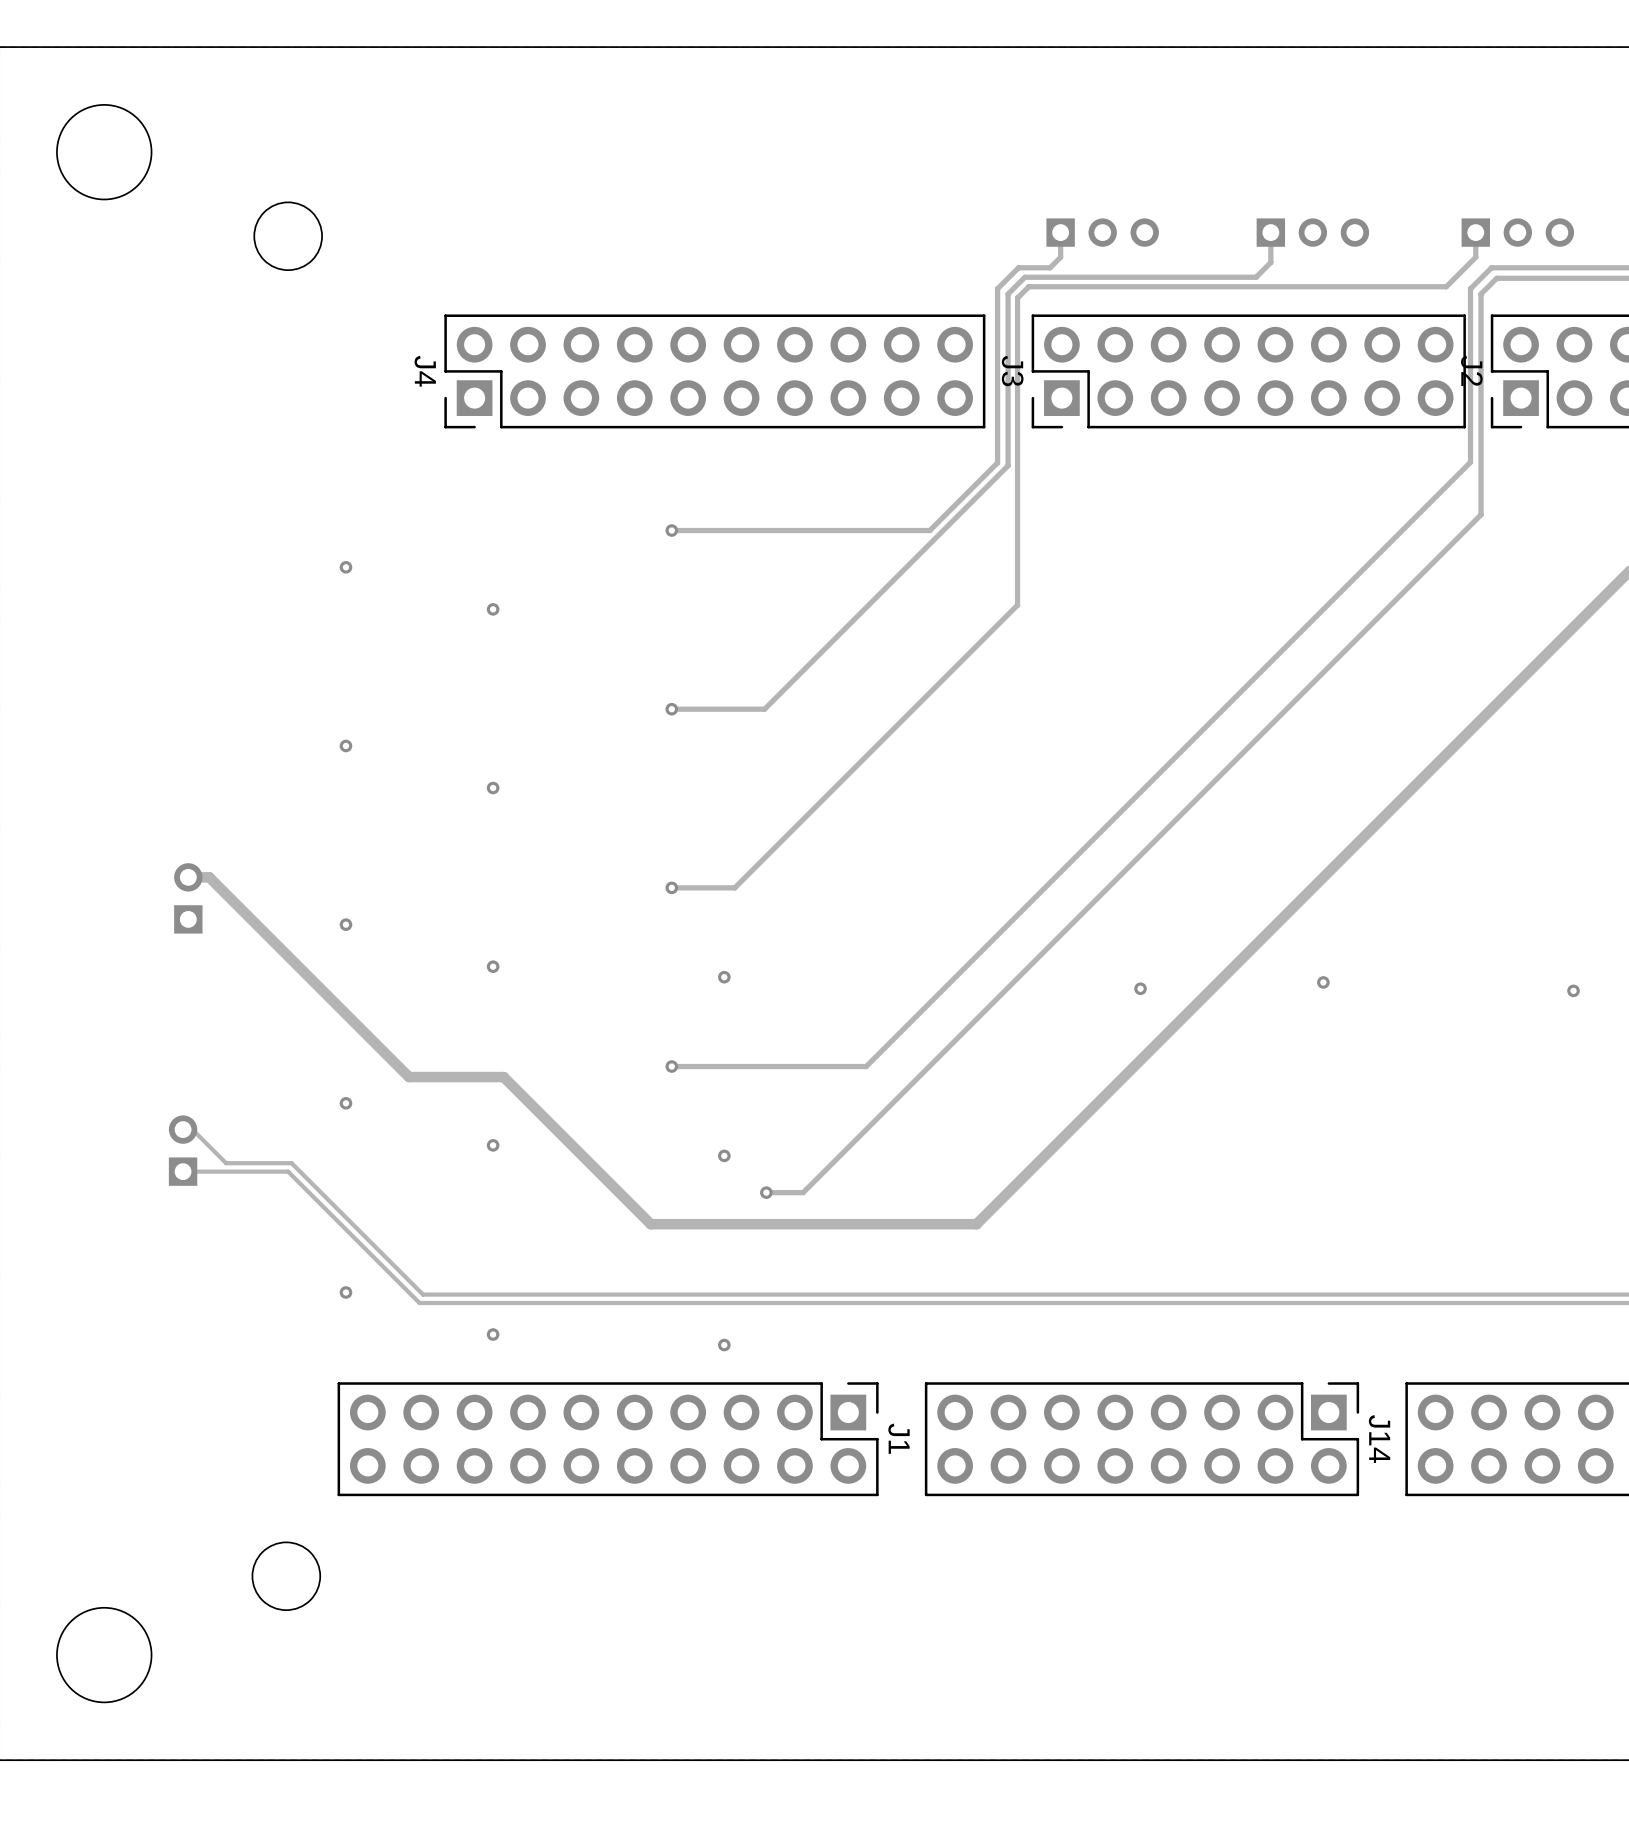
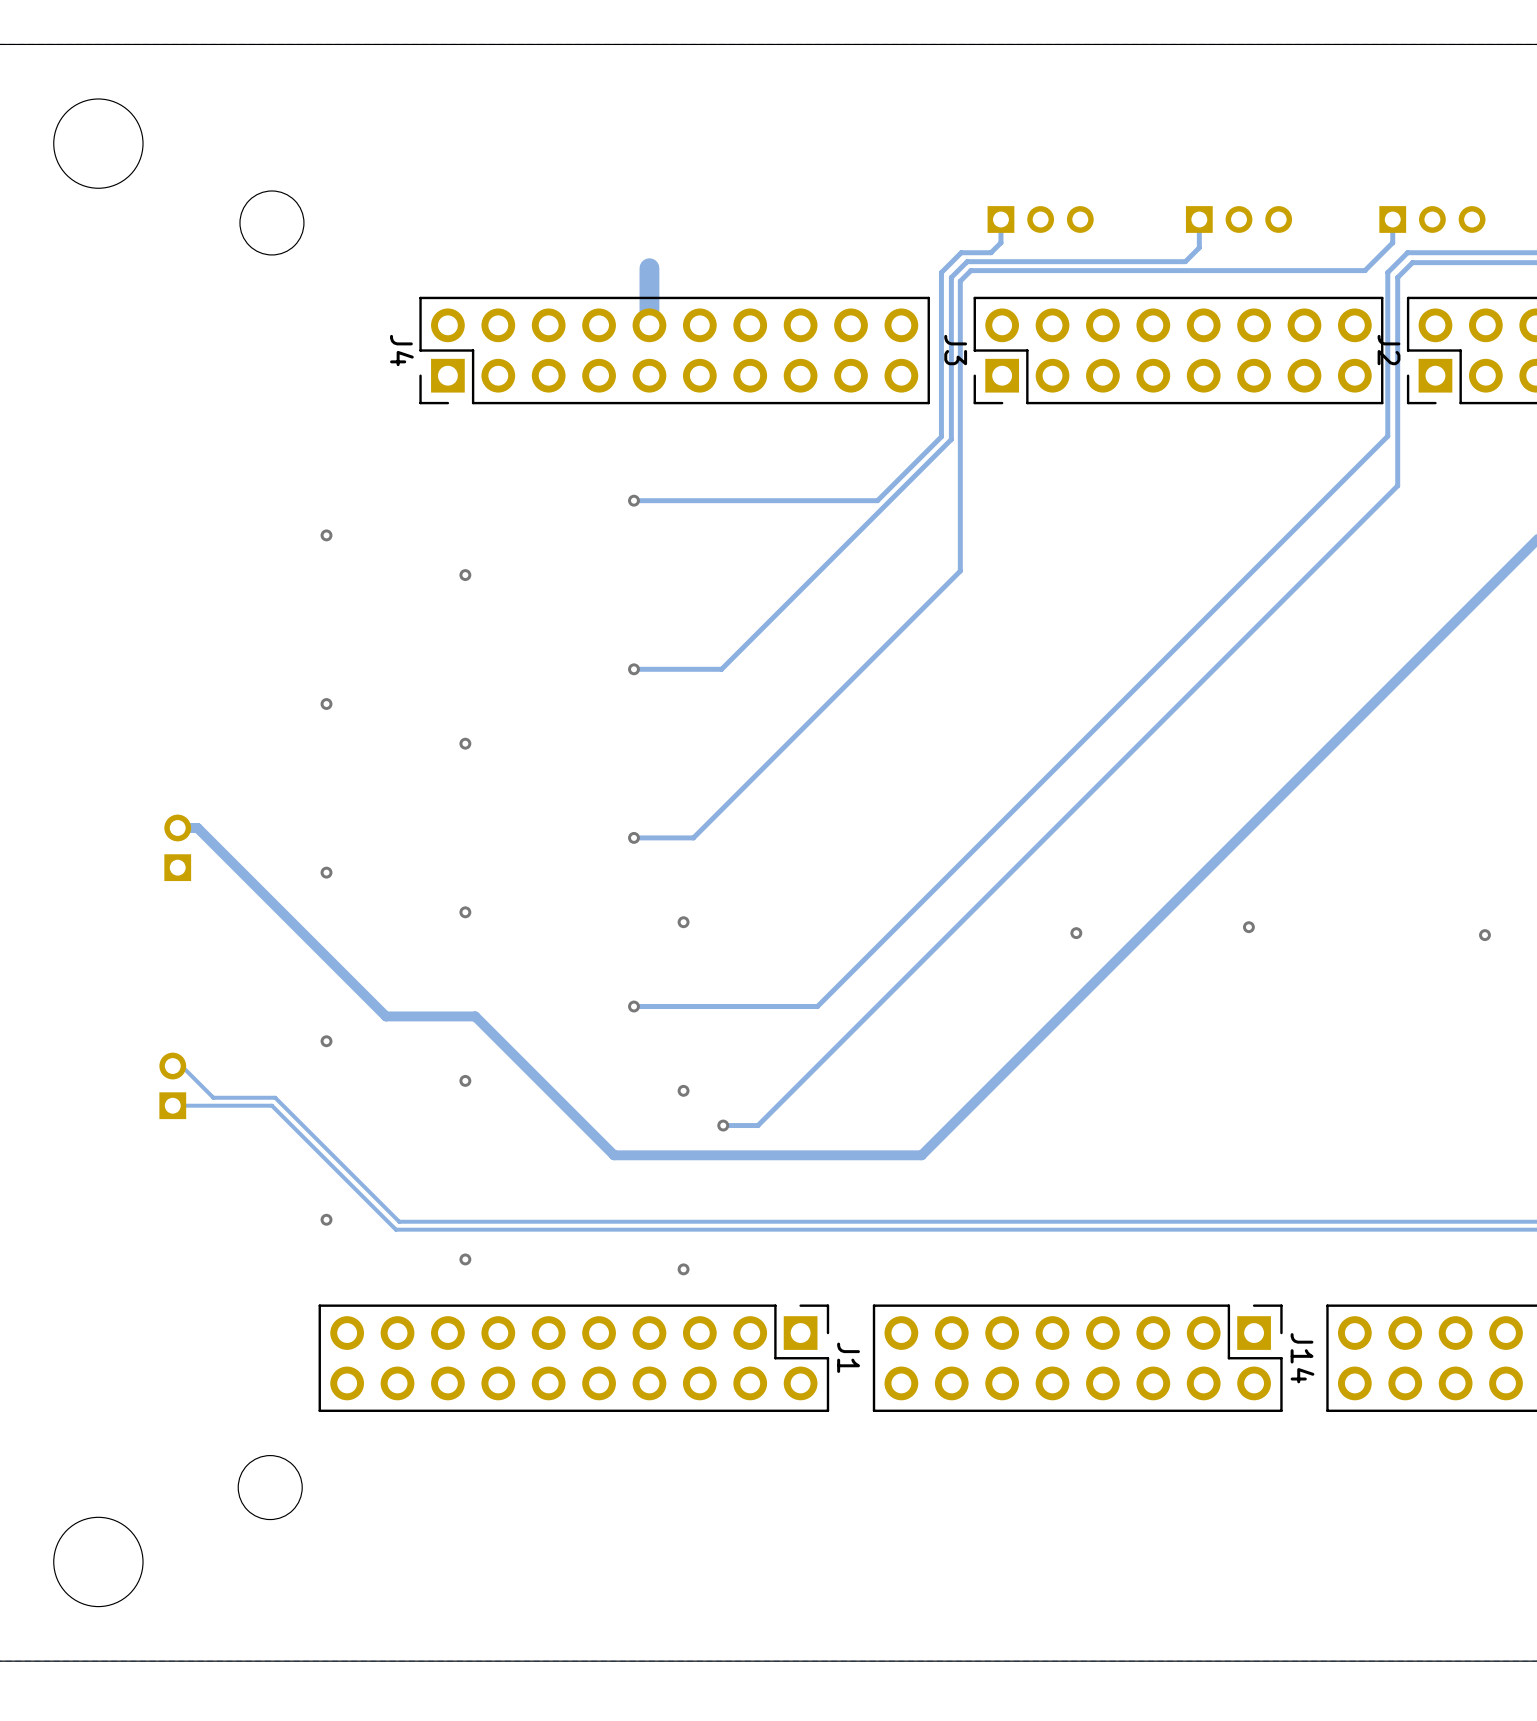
track: none -> (649, 268) (649, 325)

